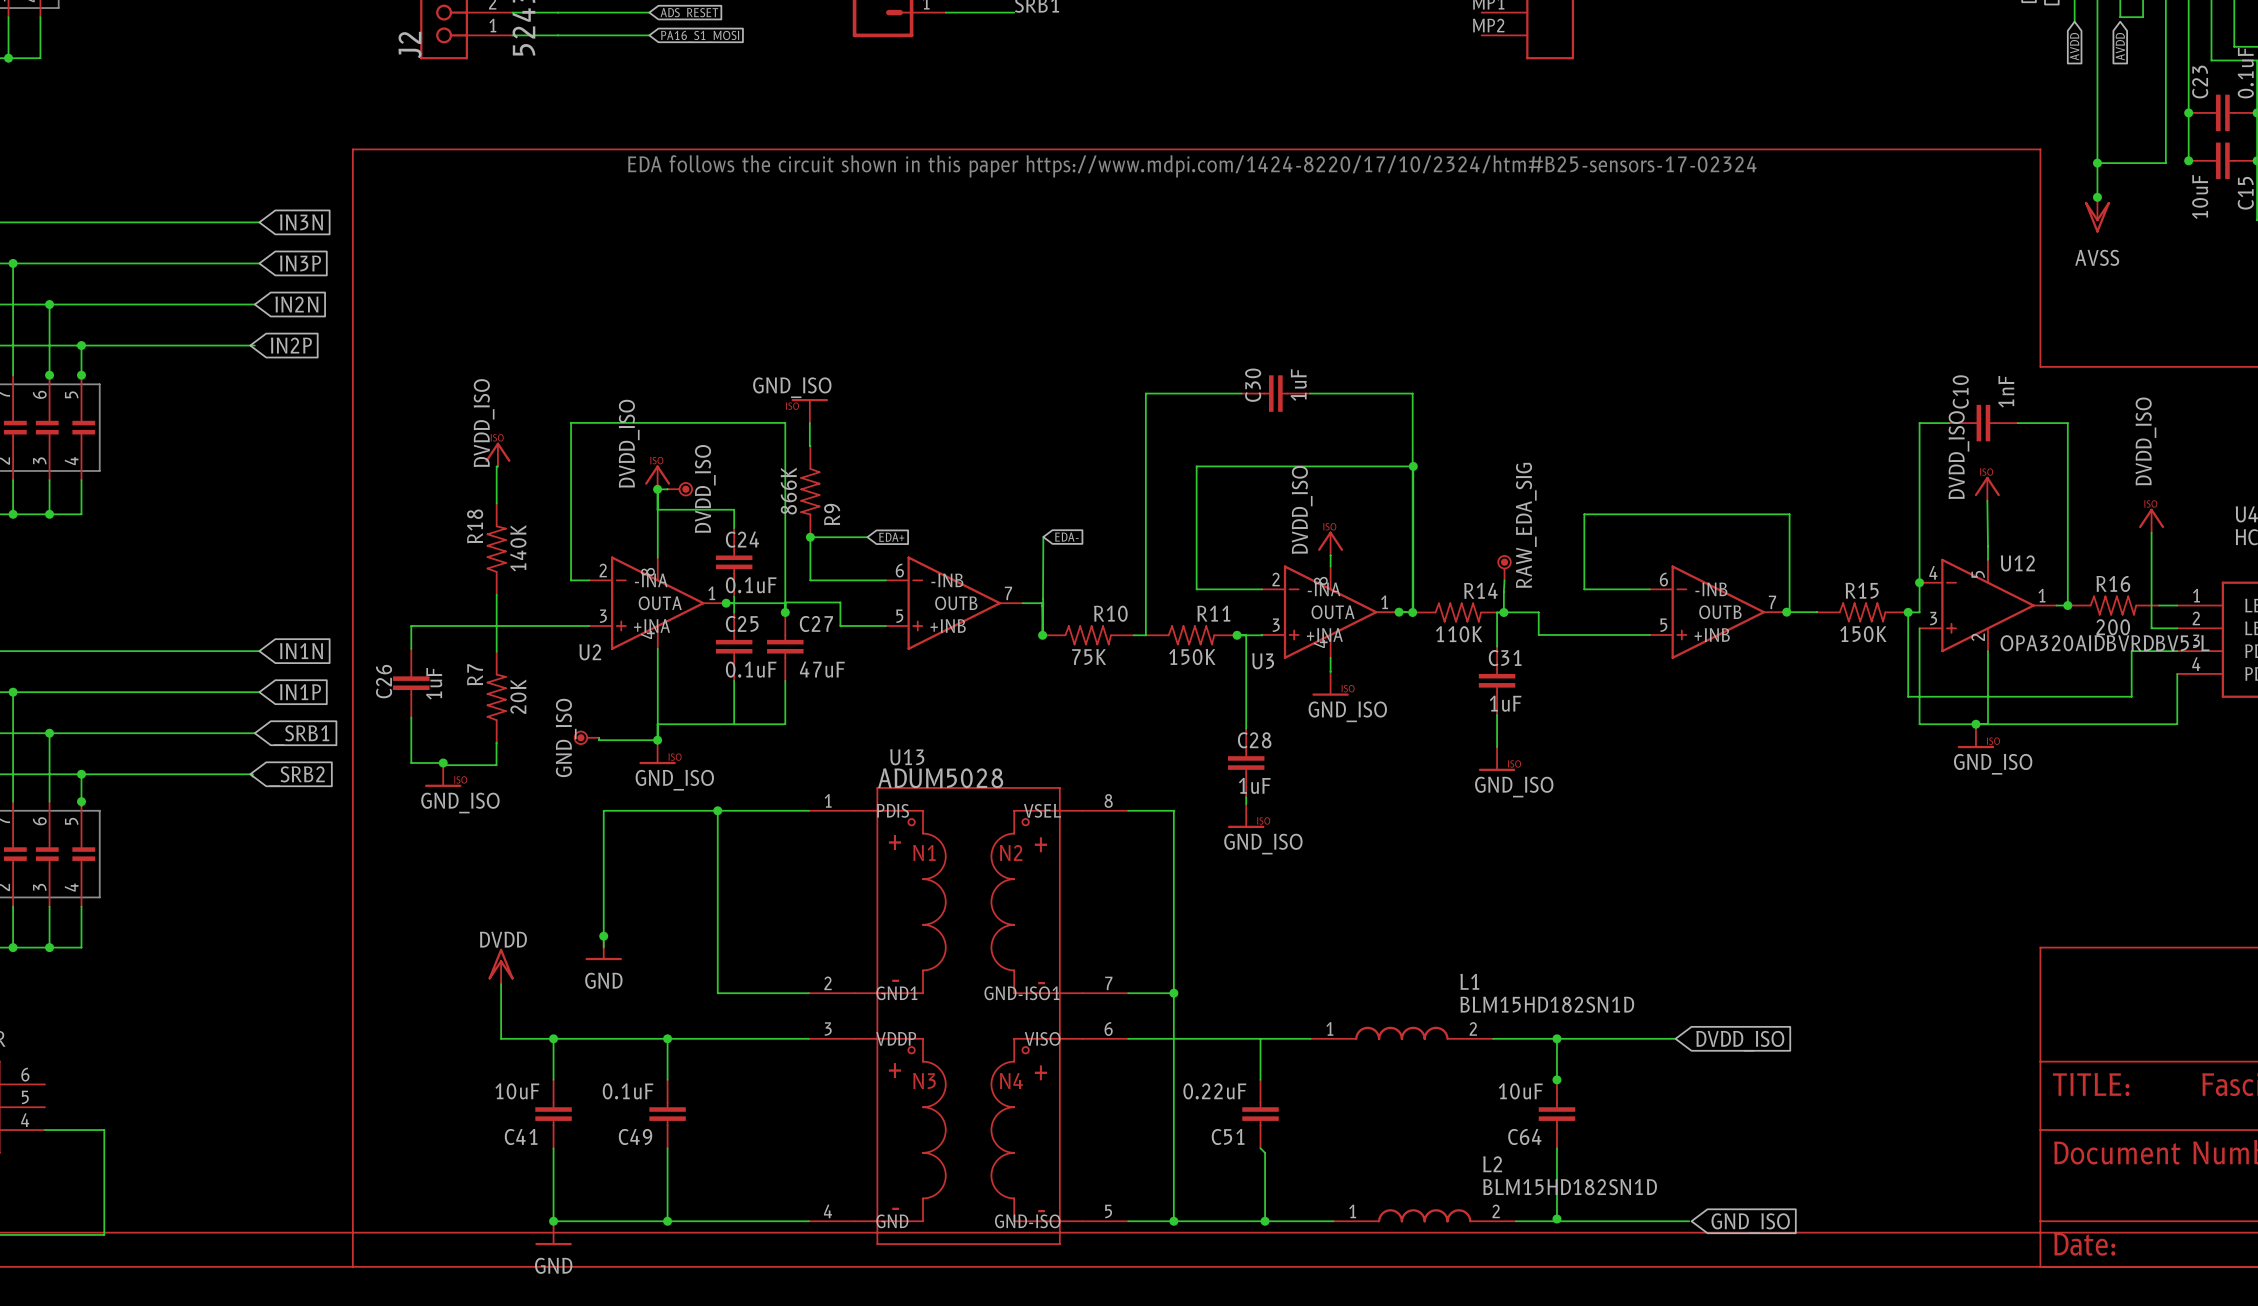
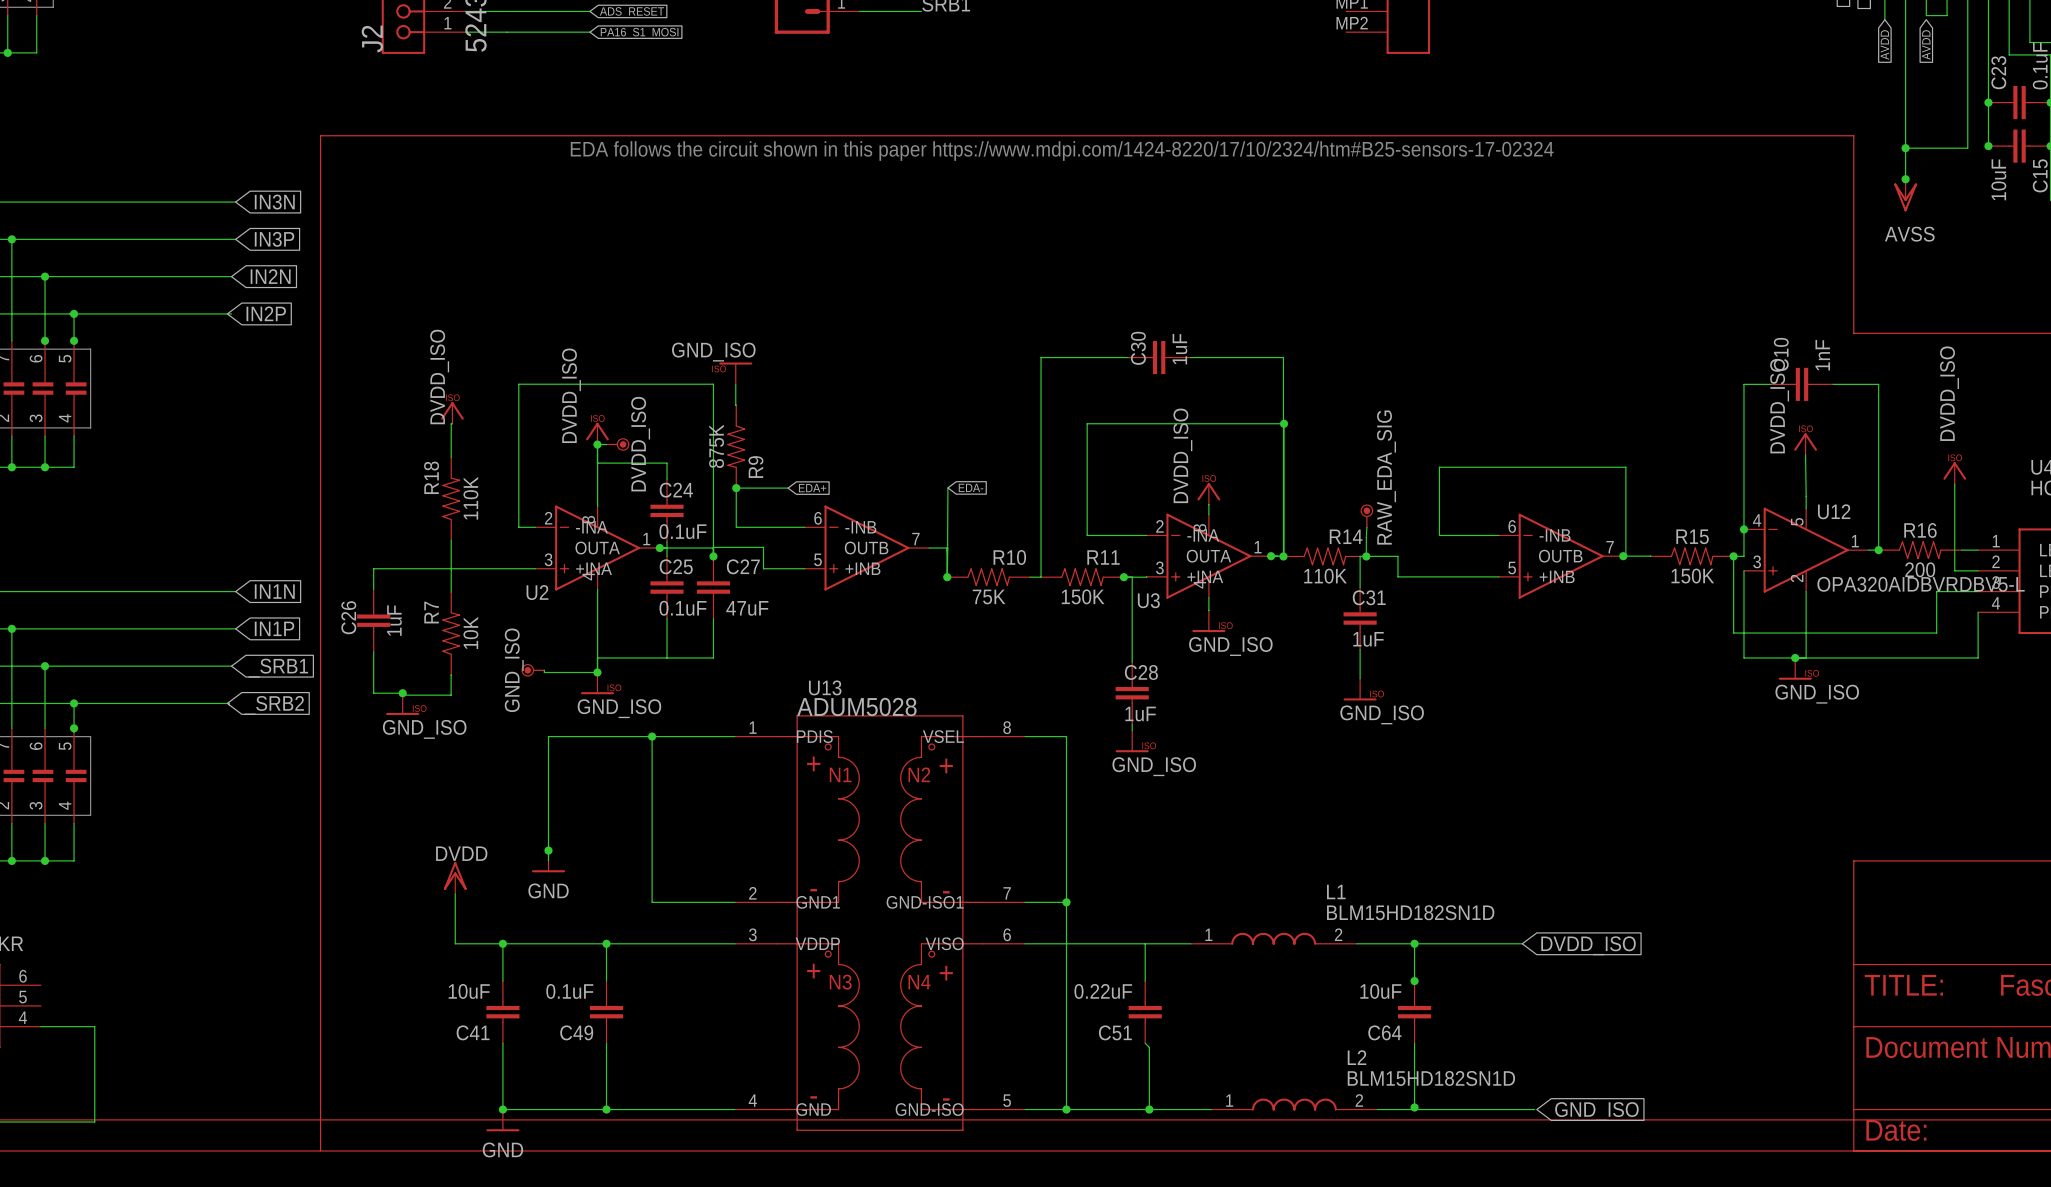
R9 value: 866K (788, 491) -> 875K (716, 446)
R18 value: 140K (518, 548) -> 110K (470, 498)
R7 value: 20K (518, 696) -> 10K (470, 632)

